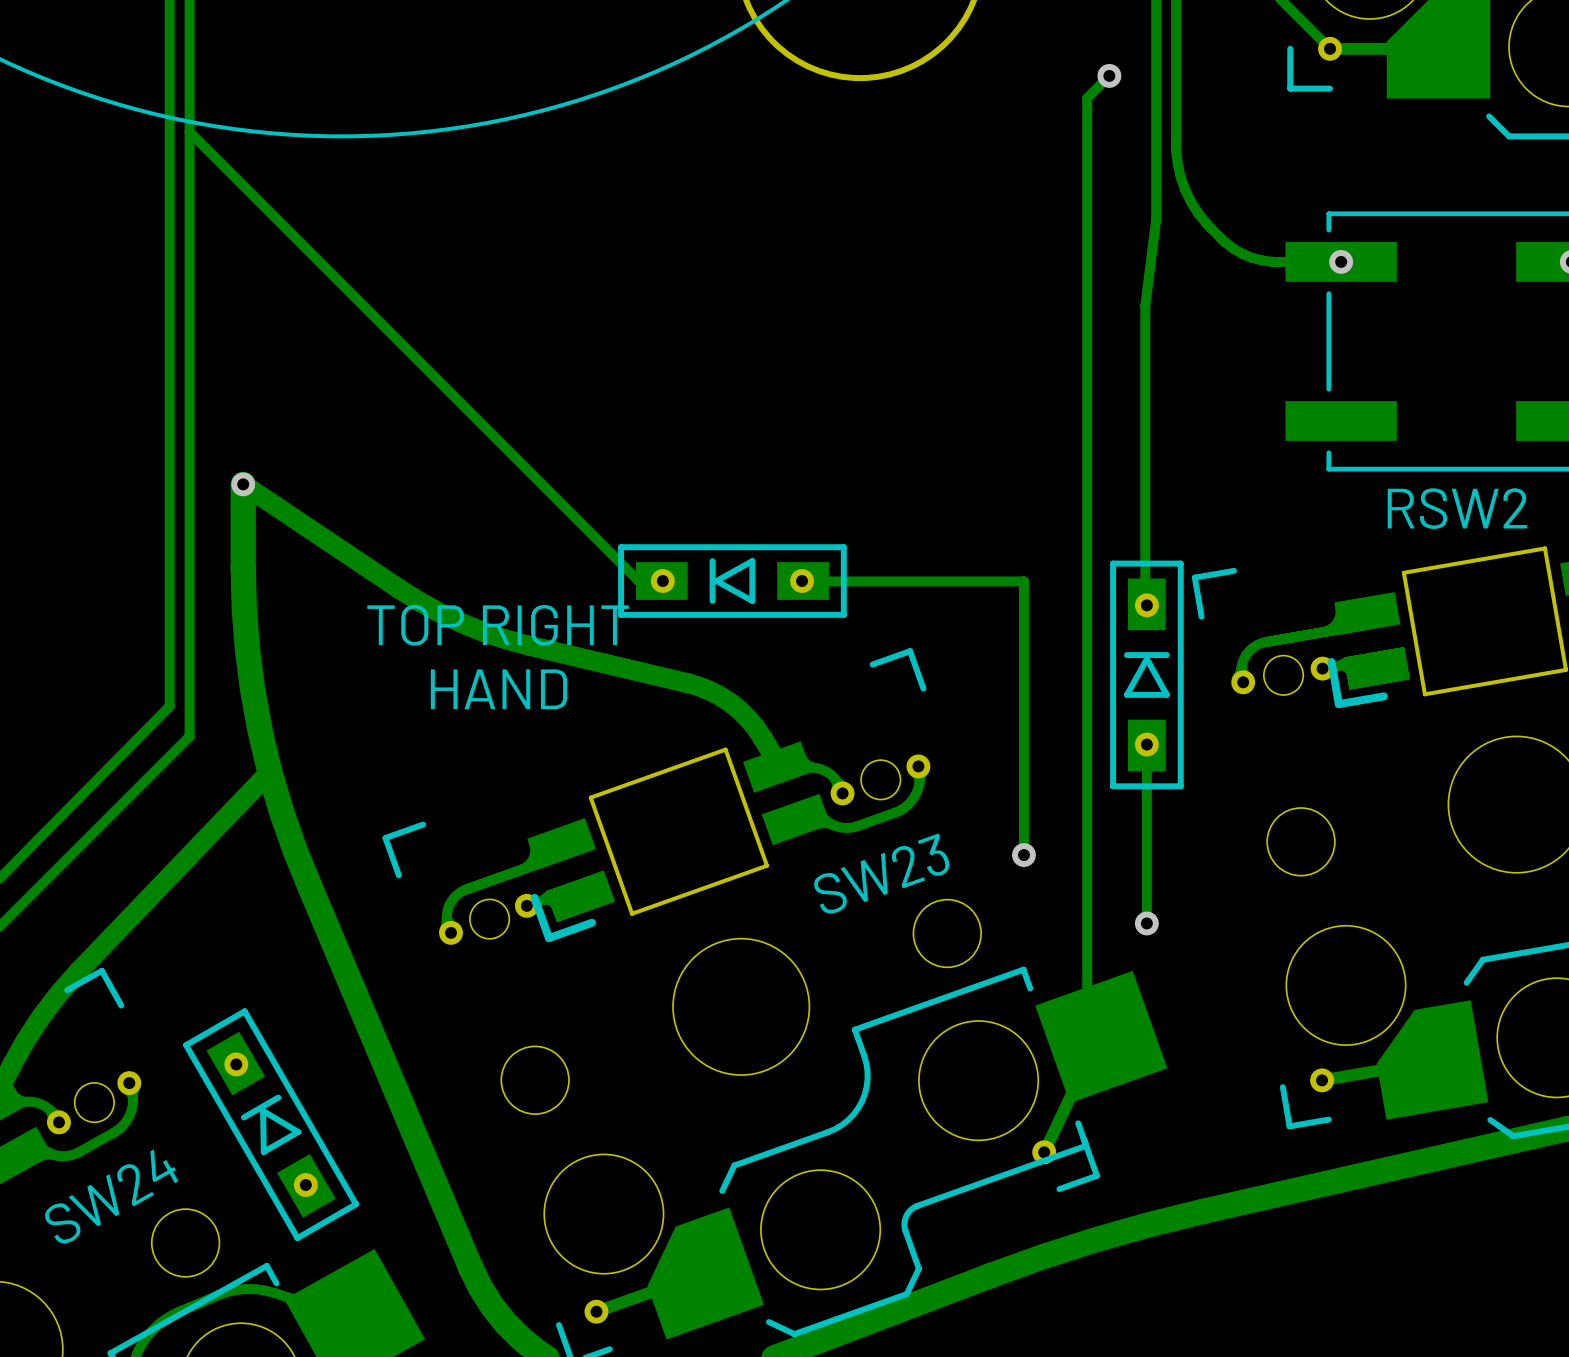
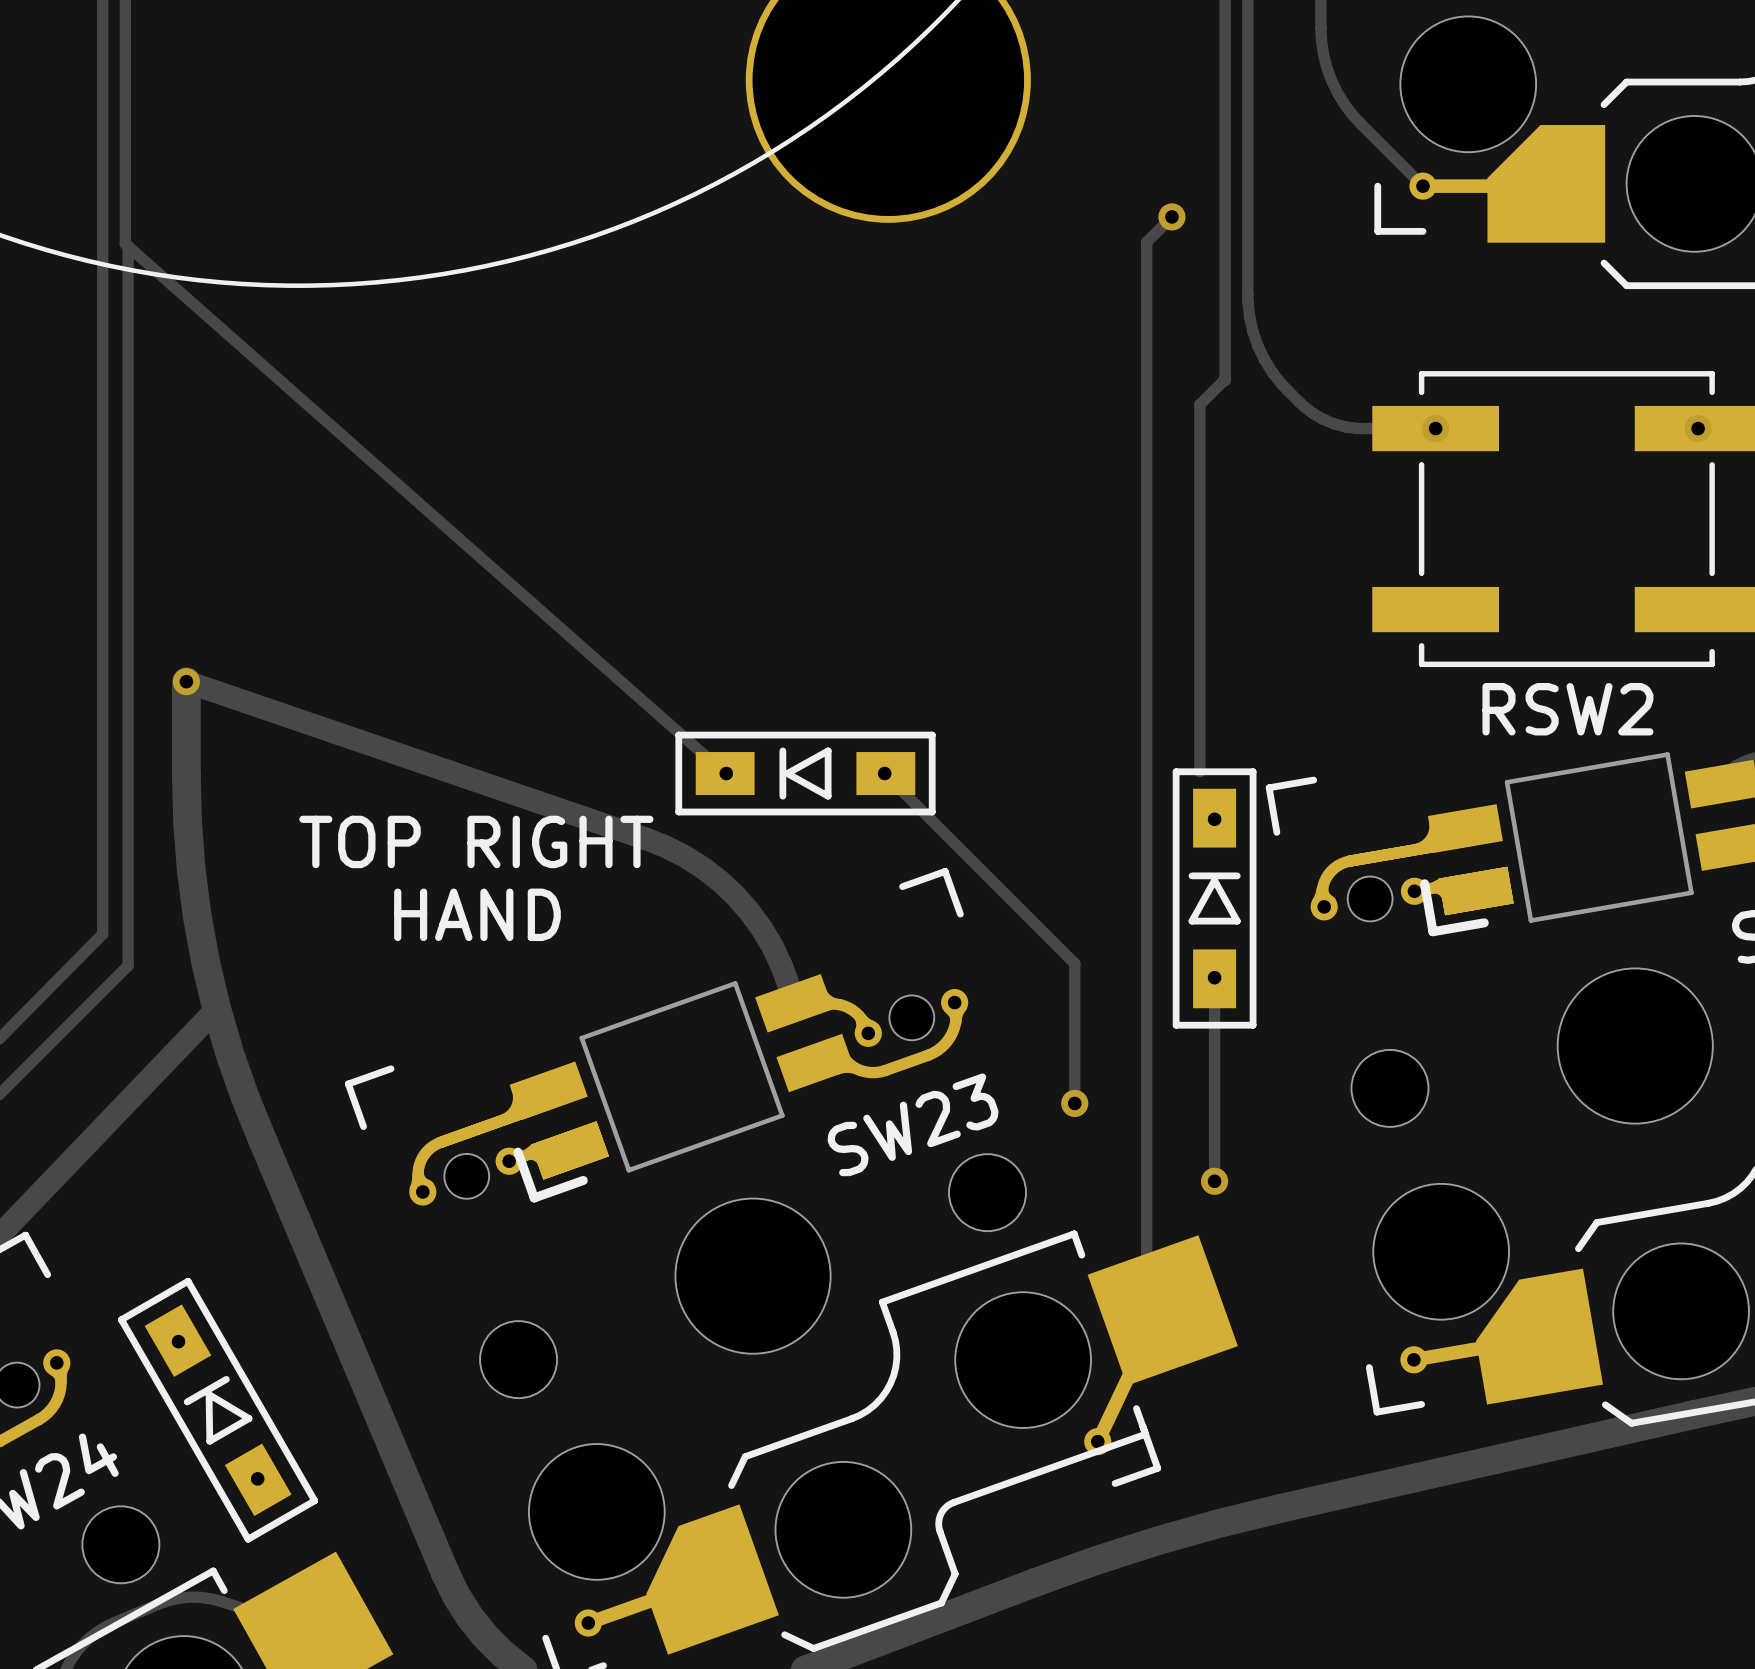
track: (189, 99) (189, 736) -> (725, 773) (125, 243) (128, 246) (128, 965) (125, 968)
track: (189, 132) (638, 581) (661, 581) -> none
track: (1156, 219) (1145, 305) (1145, 603) (1146, 605) -> (1225, 379) (1199, 404) (1199, 771)
track: (243, 484) (399, 589) (461, 623) (529, 645) (687, 683) (720, 696) (740, 710) (756, 728) (777, 762) (777, 767) -> (186, 681) (646, 838) (685, 856) (720, 881) (749, 911) (773, 947) (782, 967) (794, 1003)
part position: (732, 581) -> (805, 773)
track: (802, 581) (1023, 581) (1023, 732) -> (884, 773) (1074, 963)

